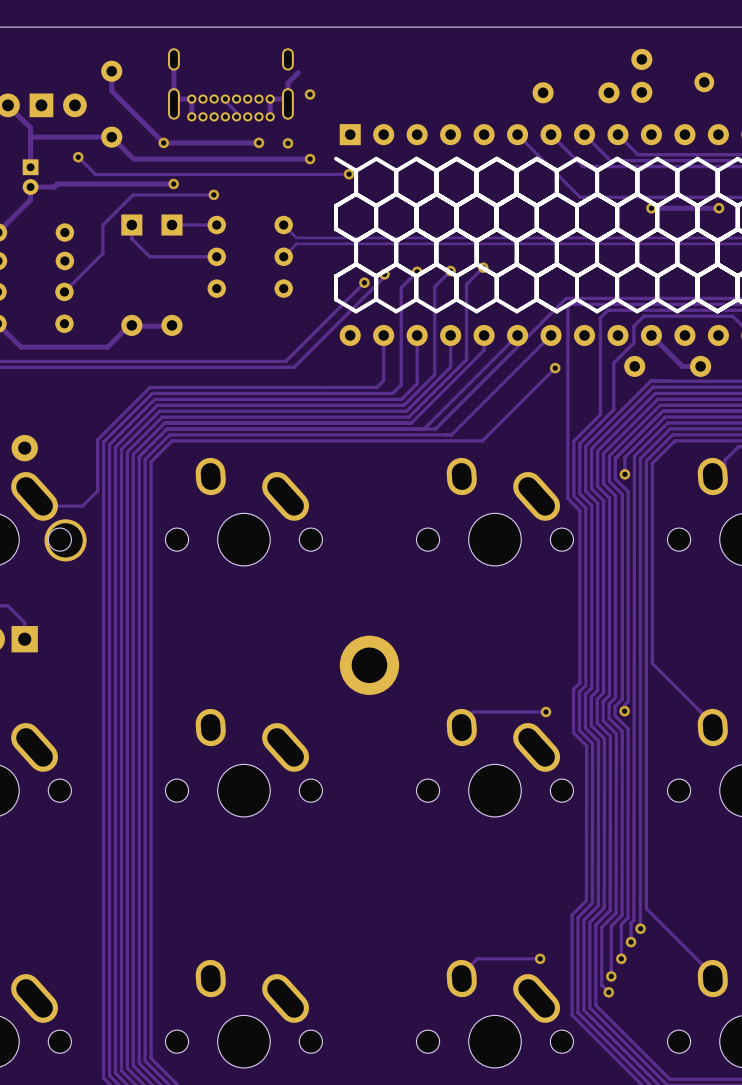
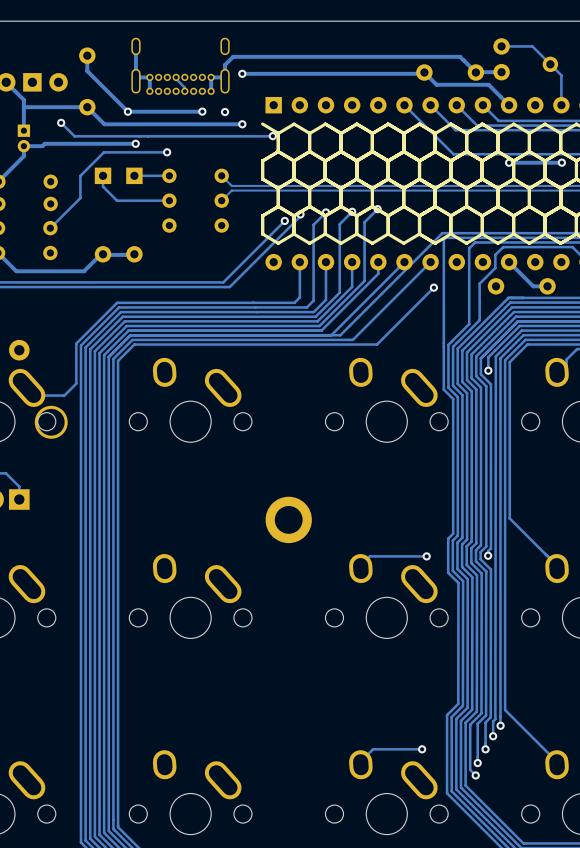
track: none -> (501, 46) (532, 46) (561, 75) (561, 105)
track: none -> (233, 56) (460, 56) (463, 60)
track: none -> (463, 60) (475, 72) (501, 72)
track: none -> (242, 73) (424, 72) (436, 84) (488, 84) (509, 105)

